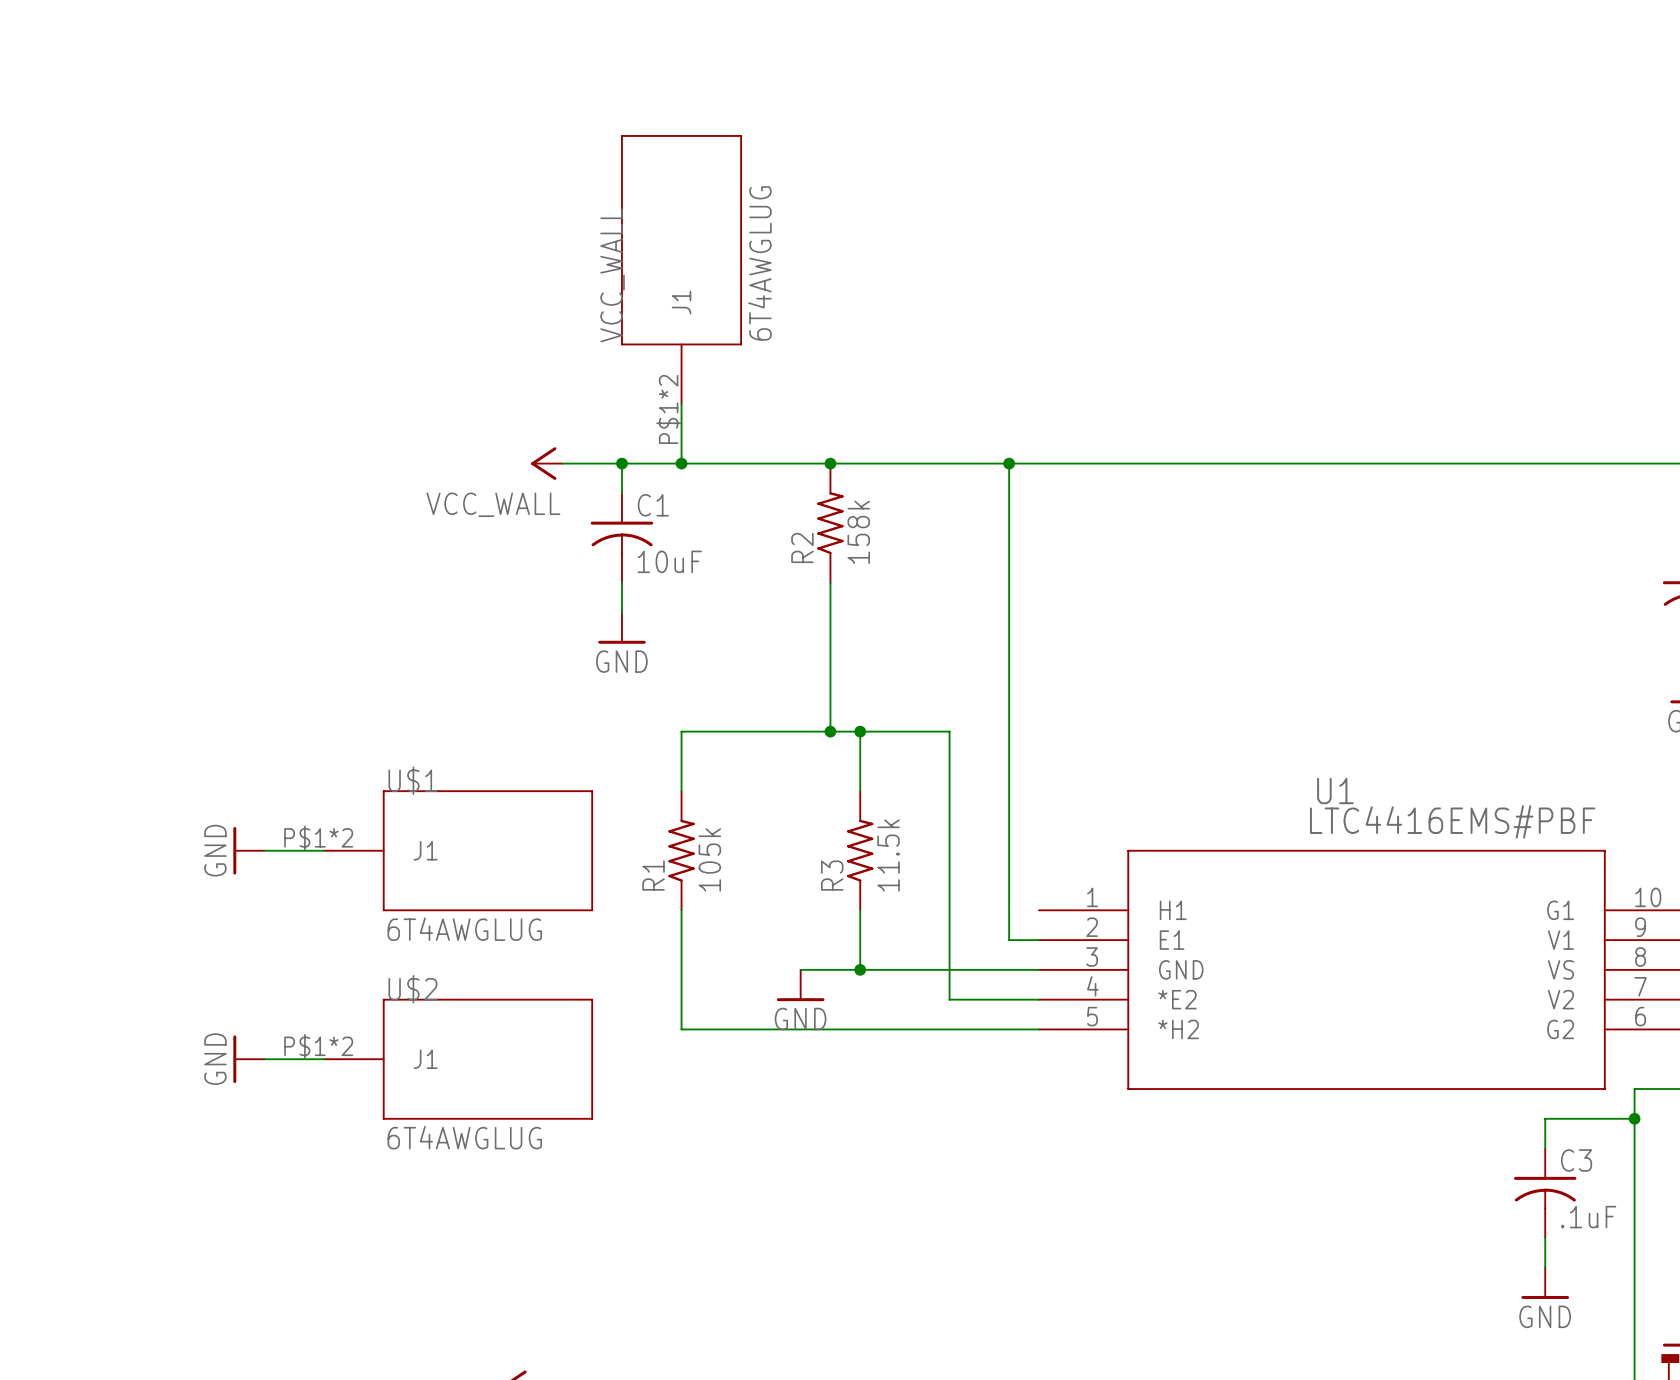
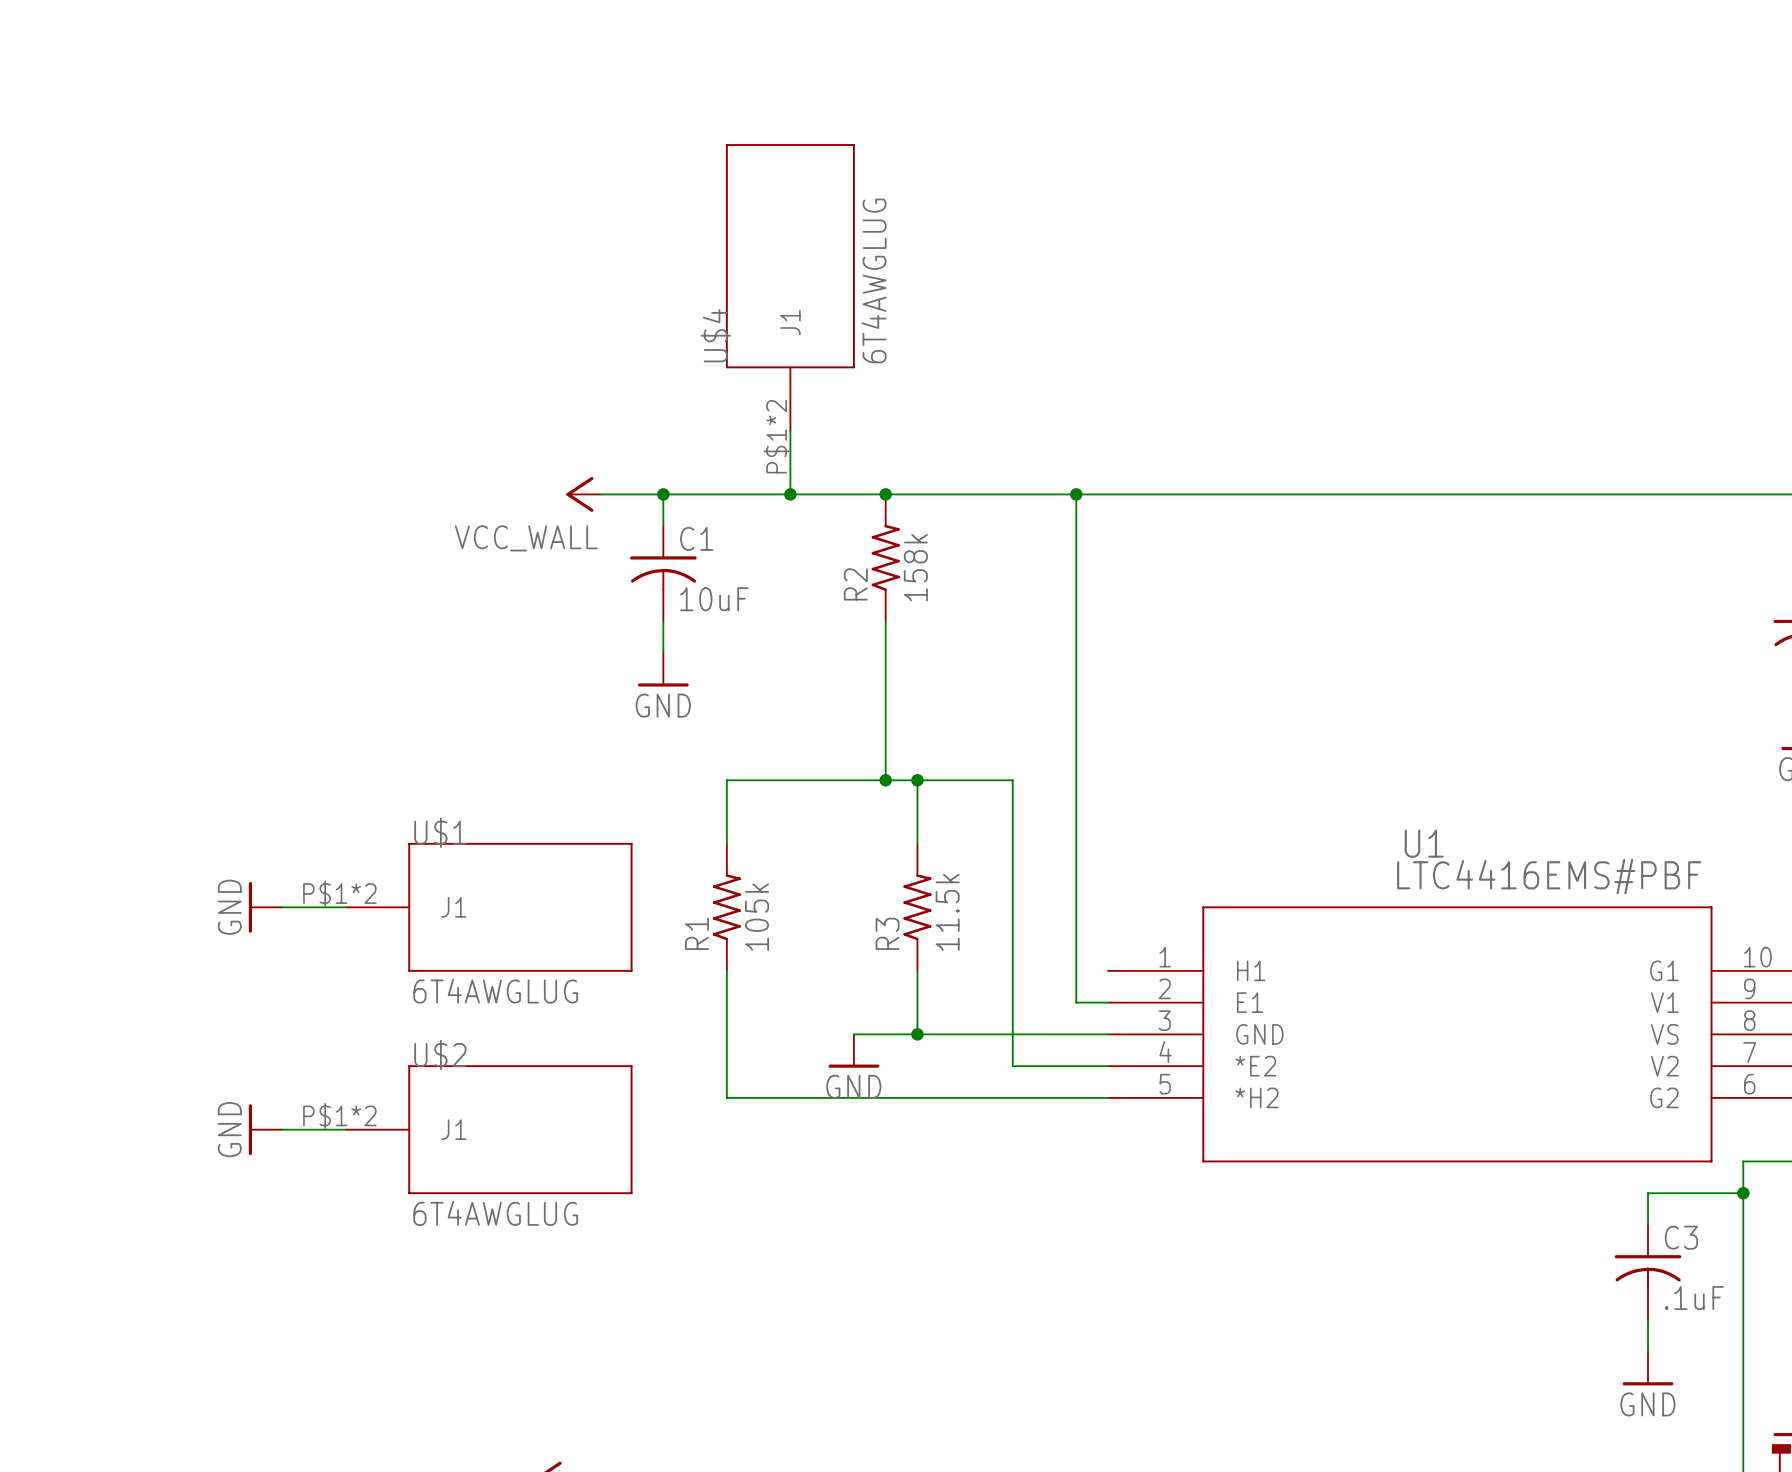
VCC_WALL: 6T4AWGLUG (681, 269) -> none
U$4: none -> 6T4AWGLUG (790, 287)
wire: (681, 404) (681, 463) -> (790, 430) (790, 494)
junction position: (681, 463) -> (790, 494)

